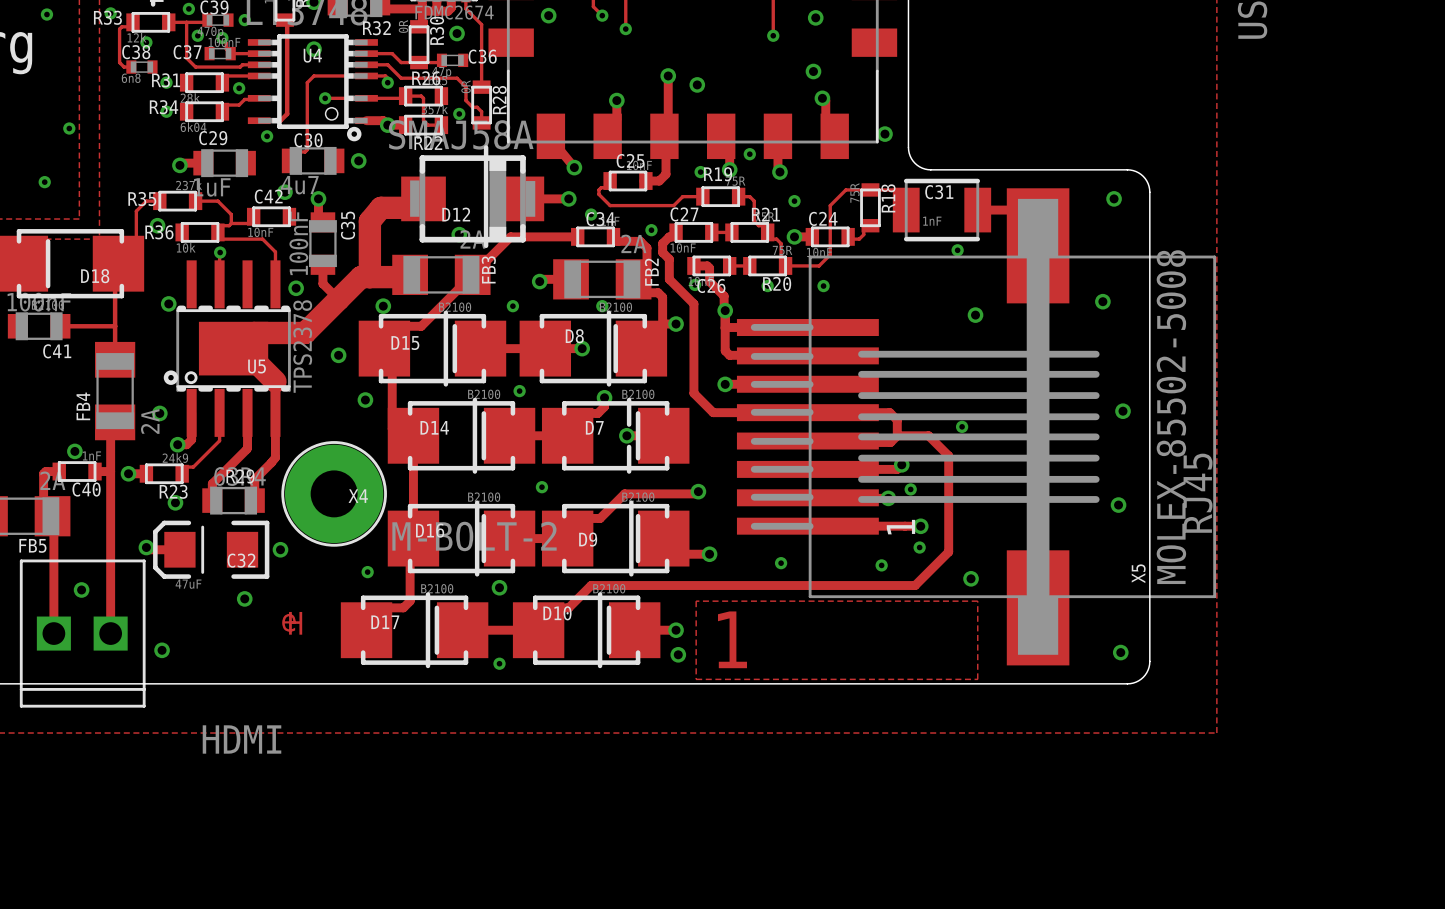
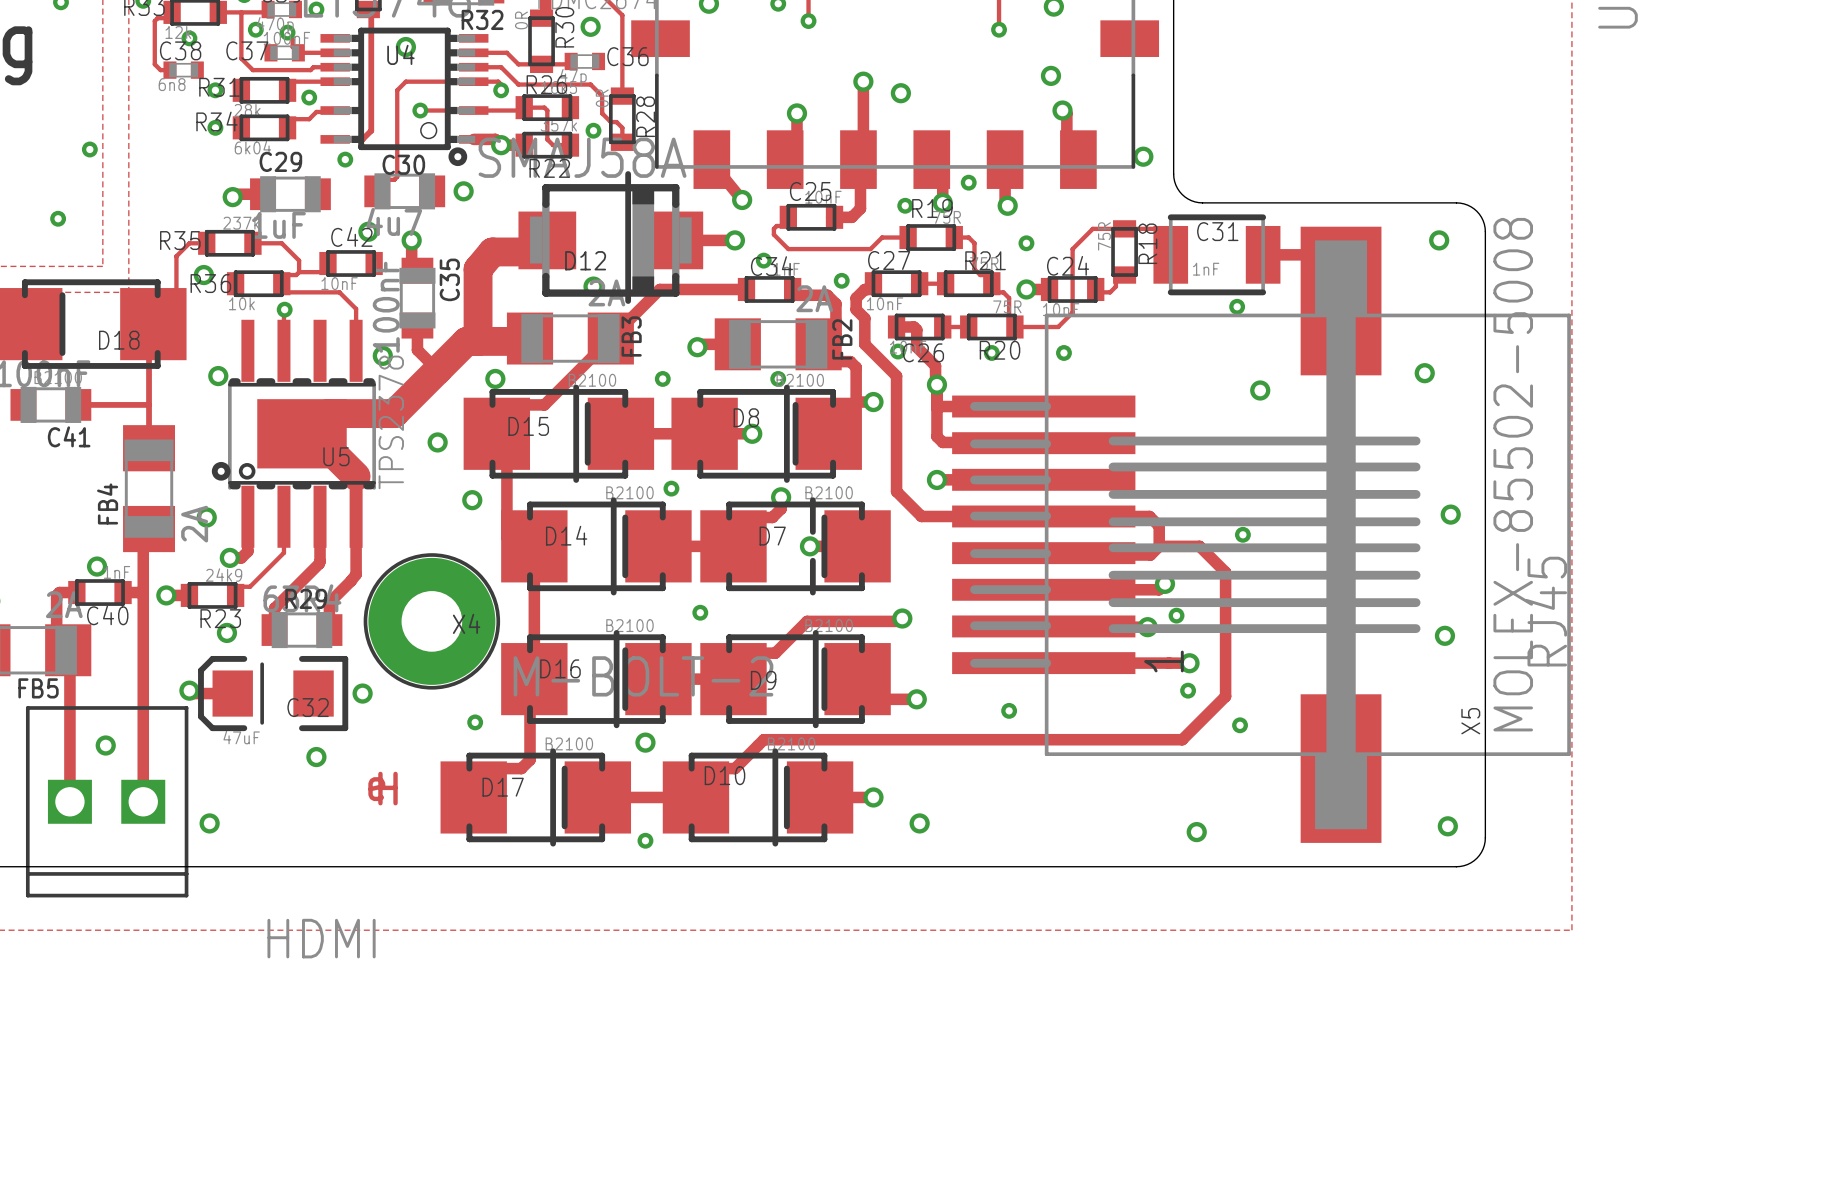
via position: (881, 565) -> (1240, 725)
via position: (971, 578) -> (1196, 832)
zone outline: (696, 601) (696, 679) (977, 679) (977, 601) (696, 601) -> none
text: 1 (732, 639) -> none
via position: (678, 654) -> (919, 823)

